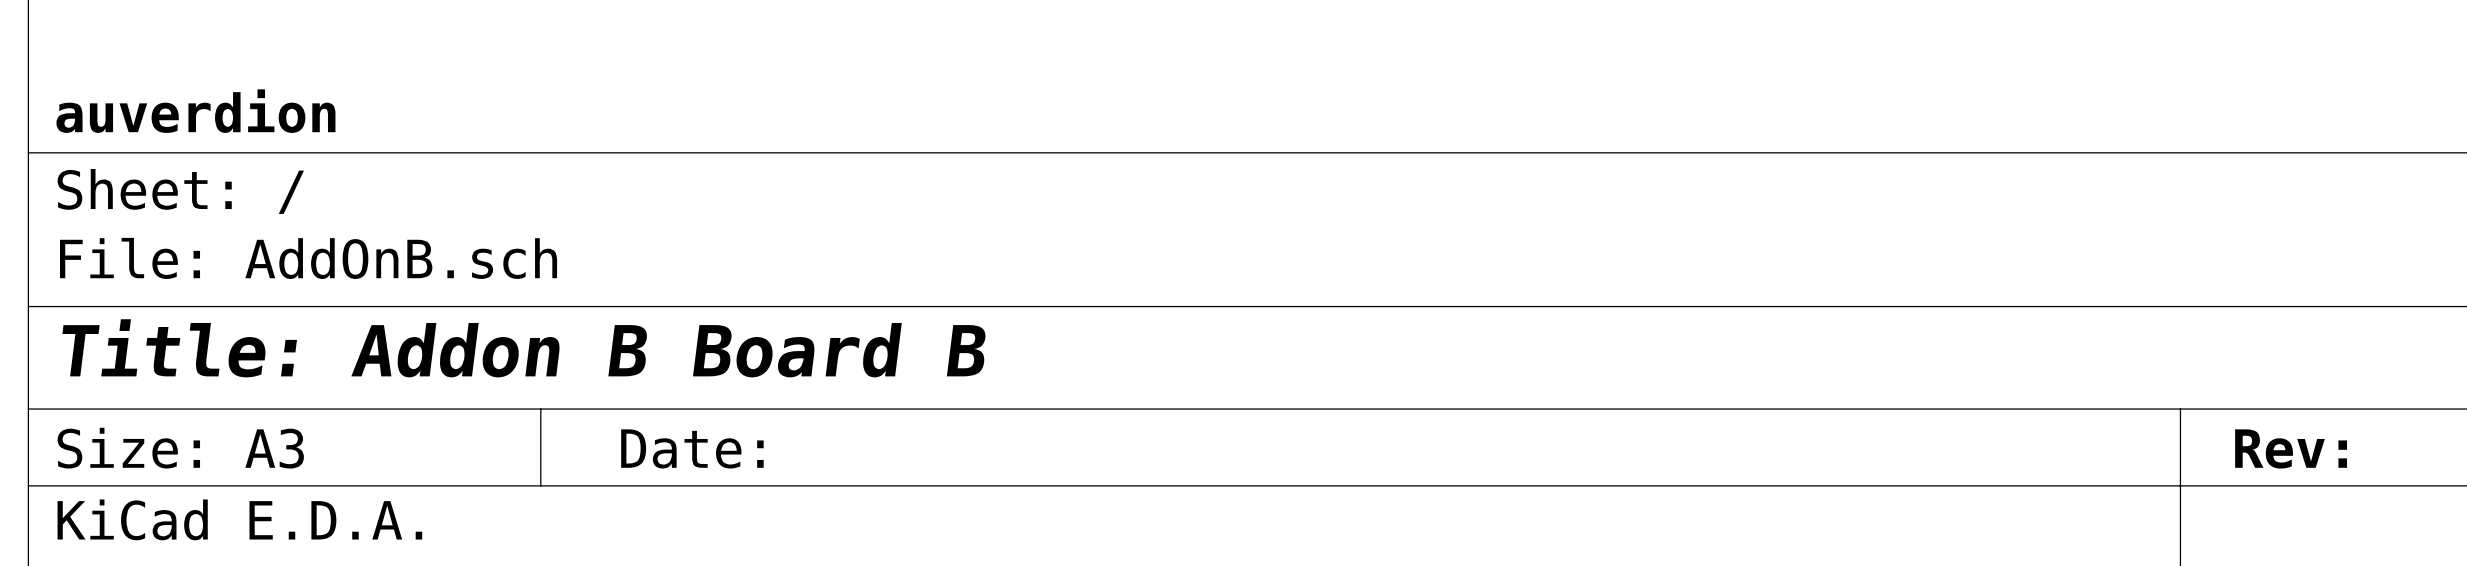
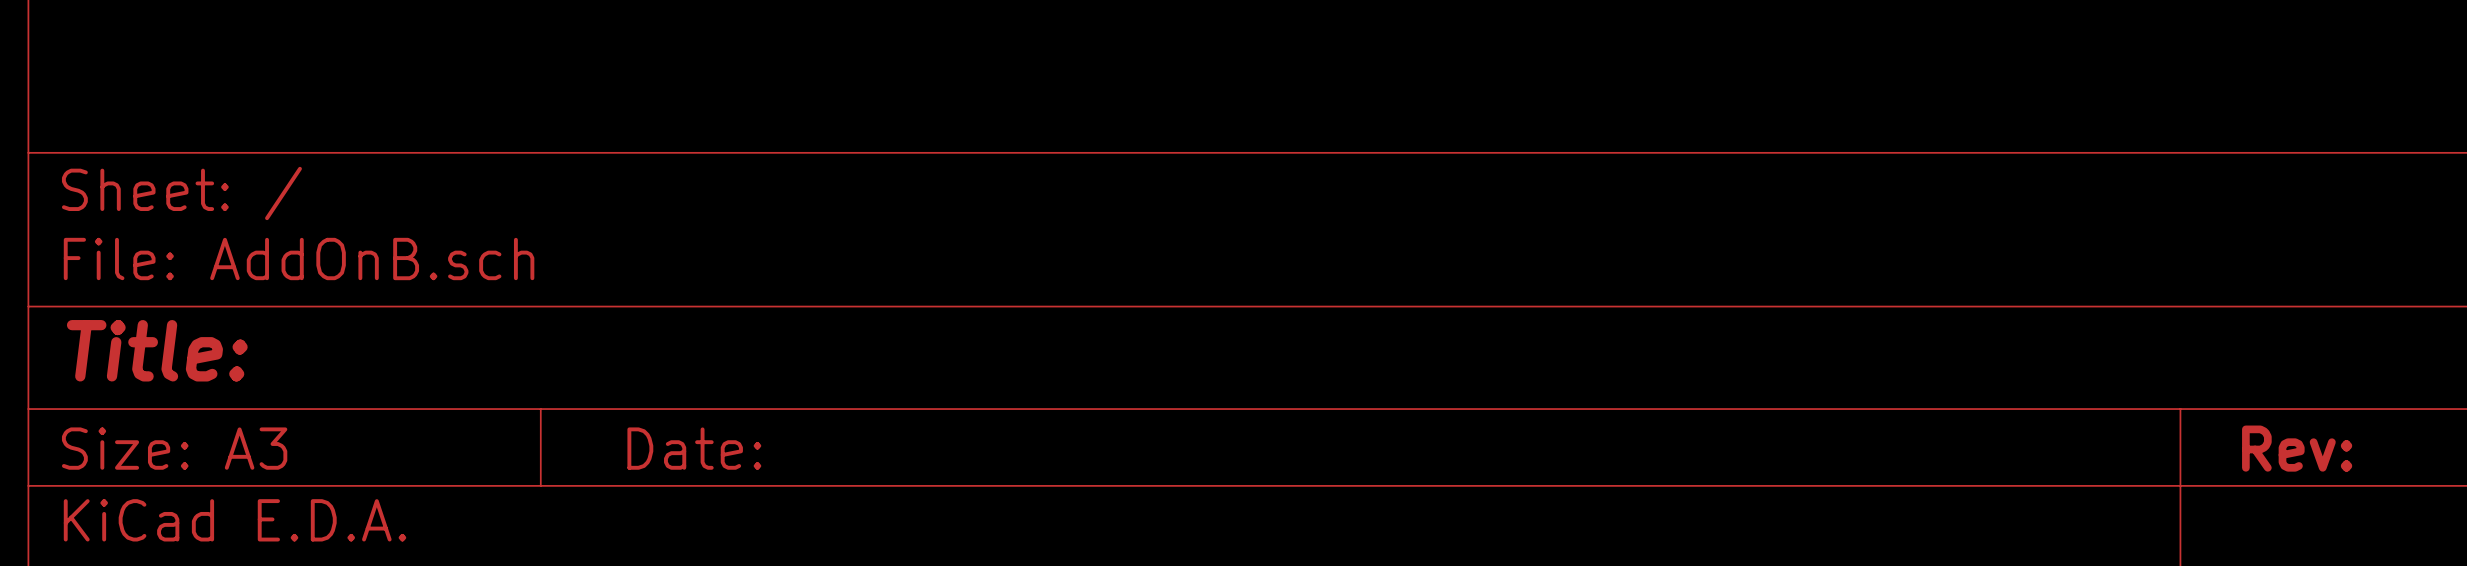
title block: auverdion (195, 111) -> none
title block: Title: Addon B Board B (524, 348) -> Title: (157, 350)

